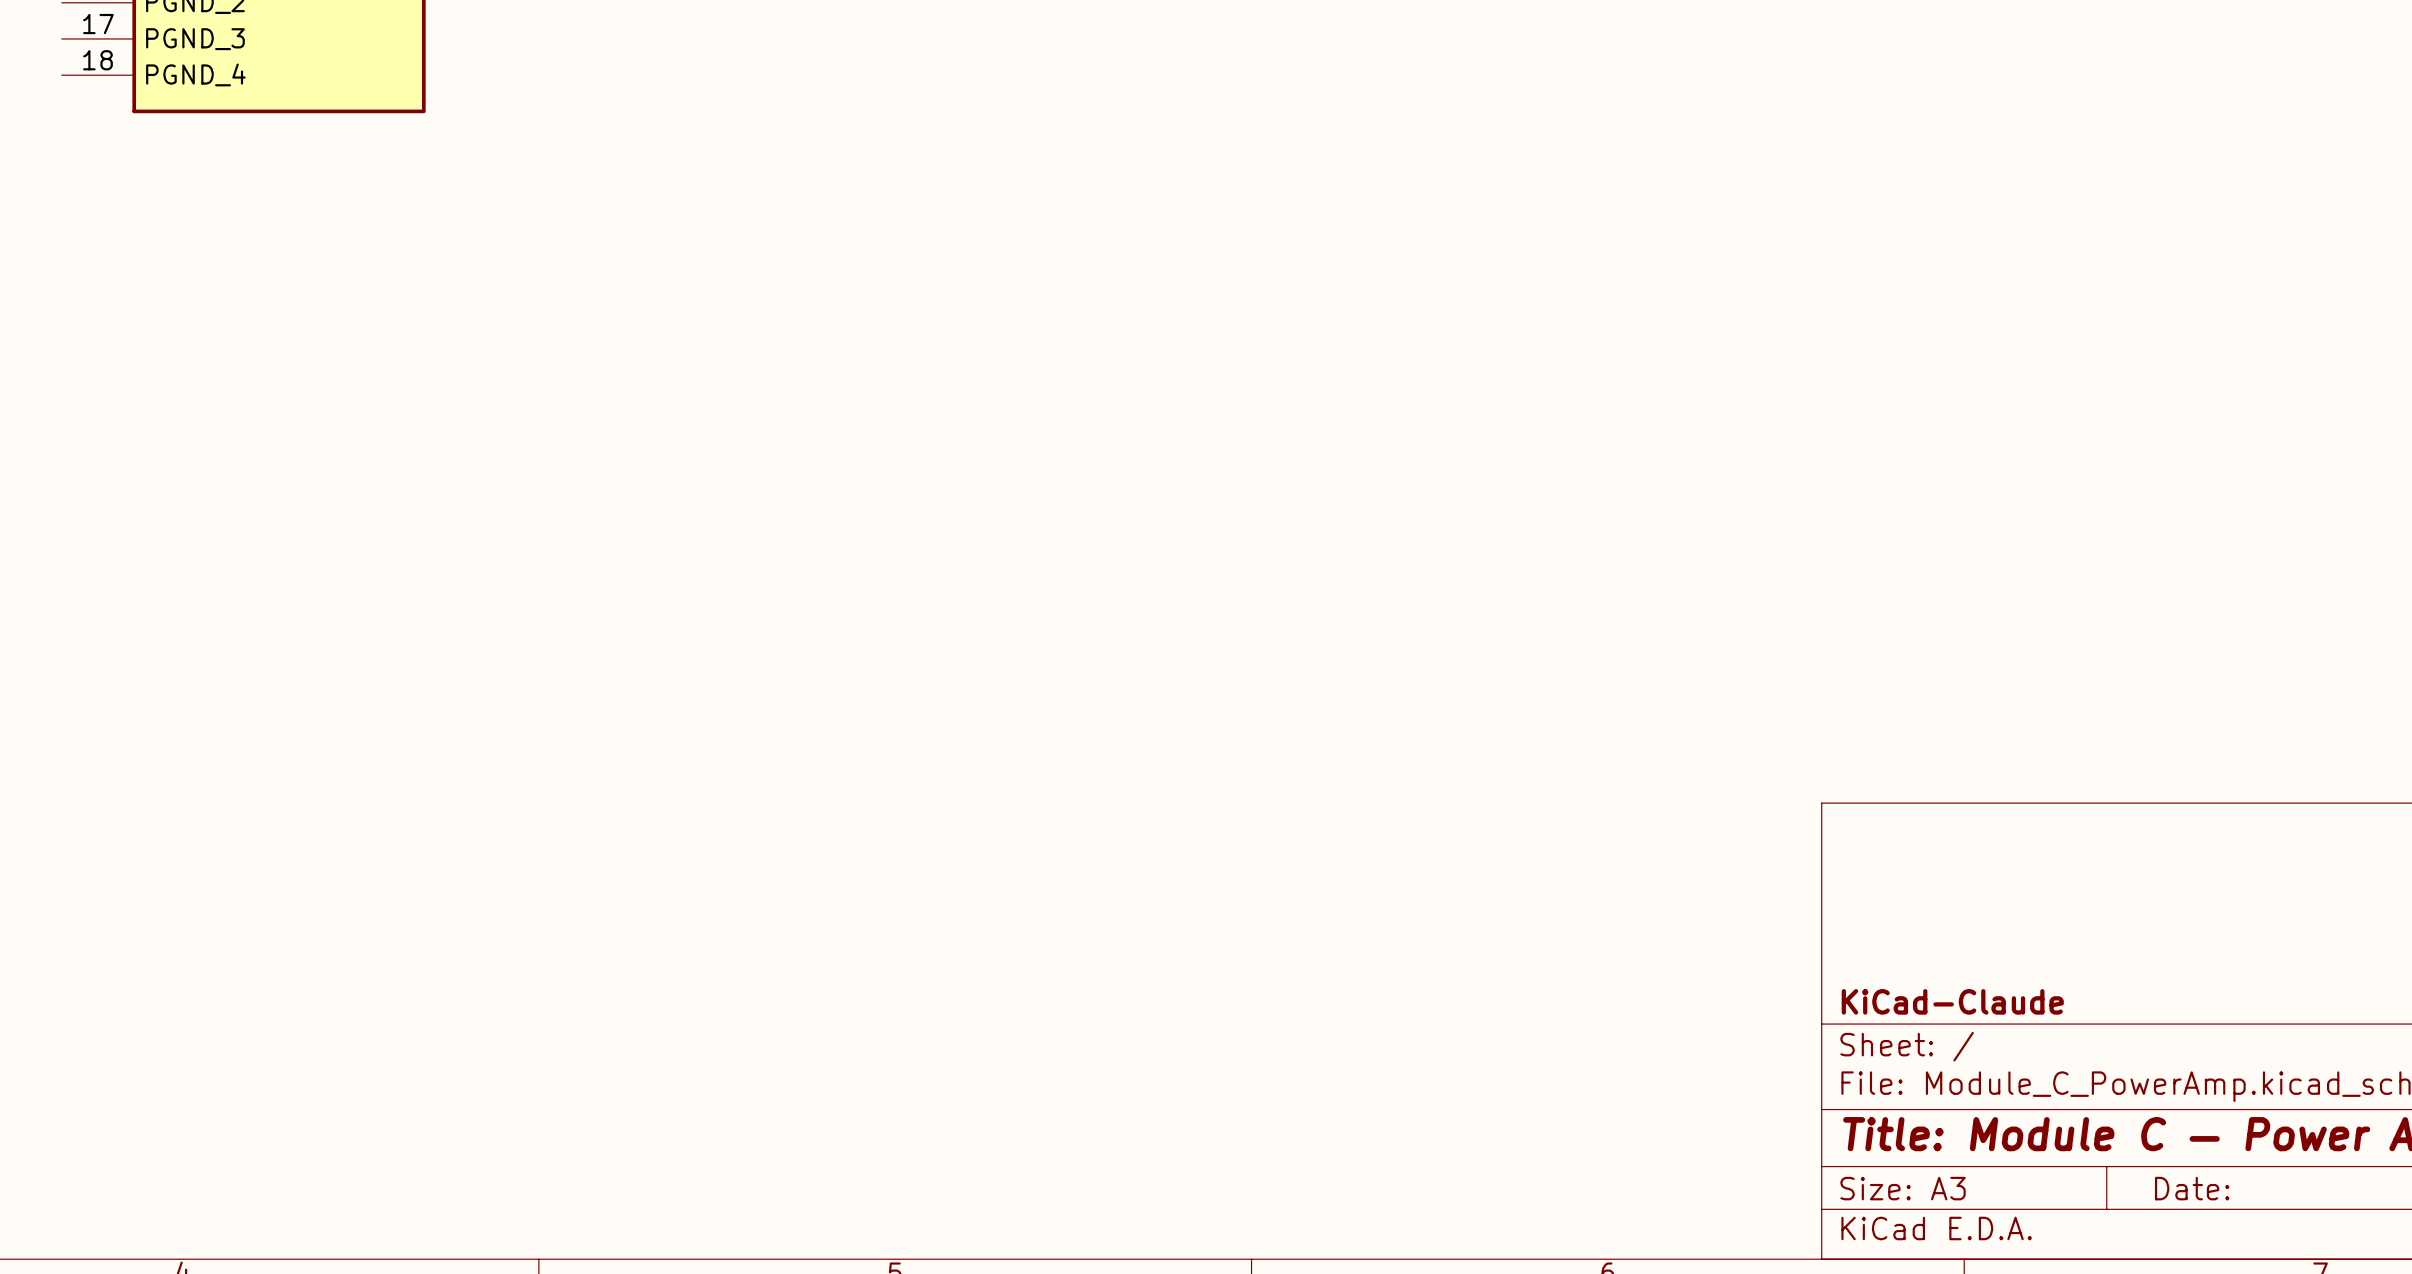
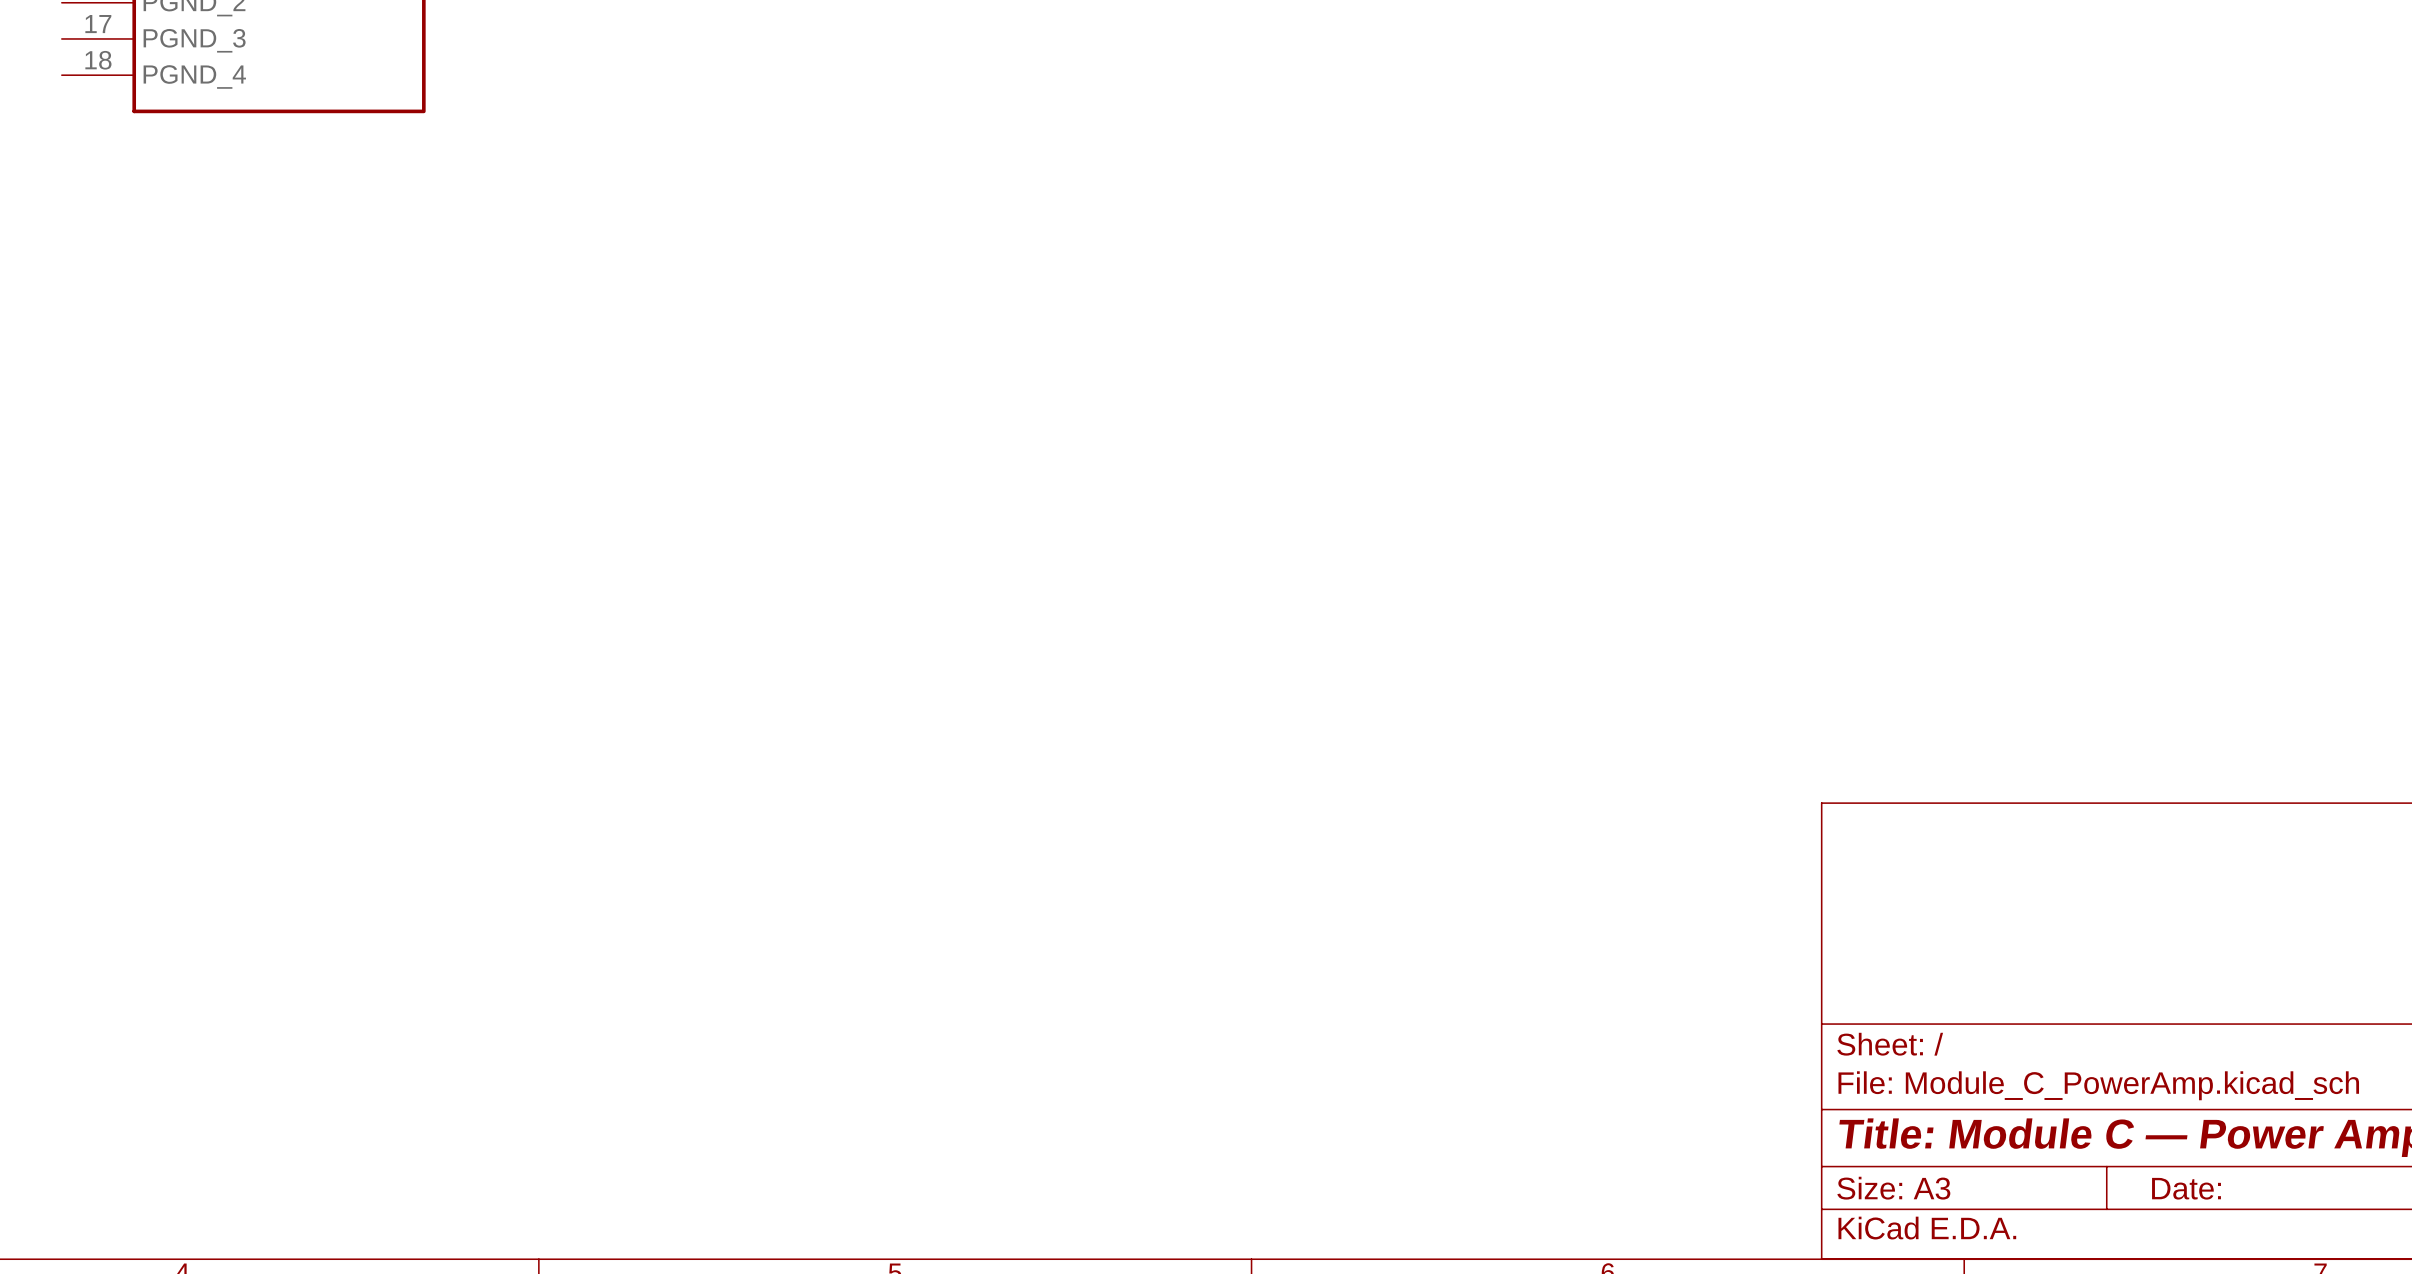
title block: KiCad-Claude (1952, 1001) -> none

